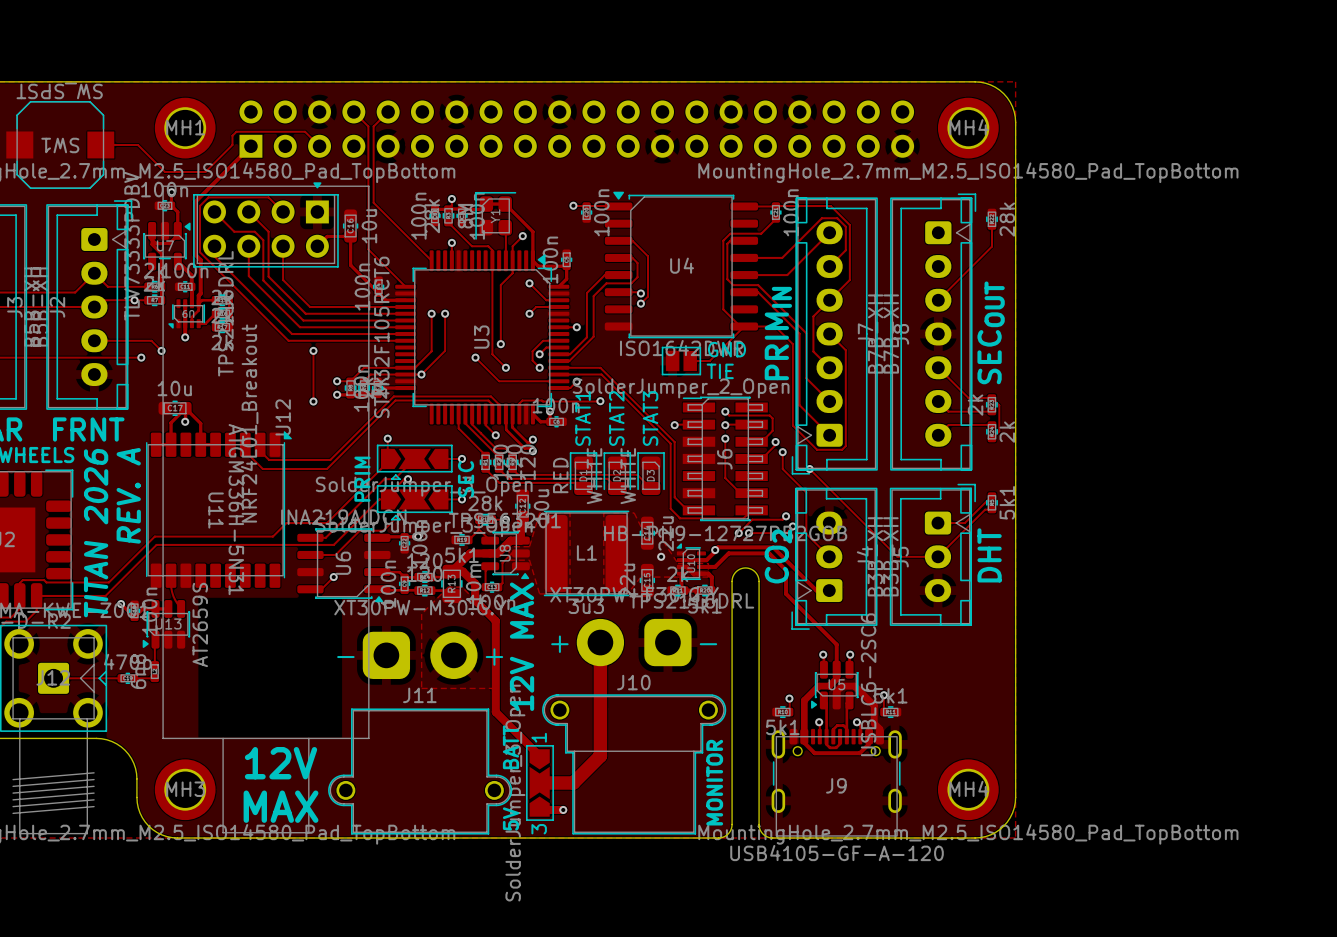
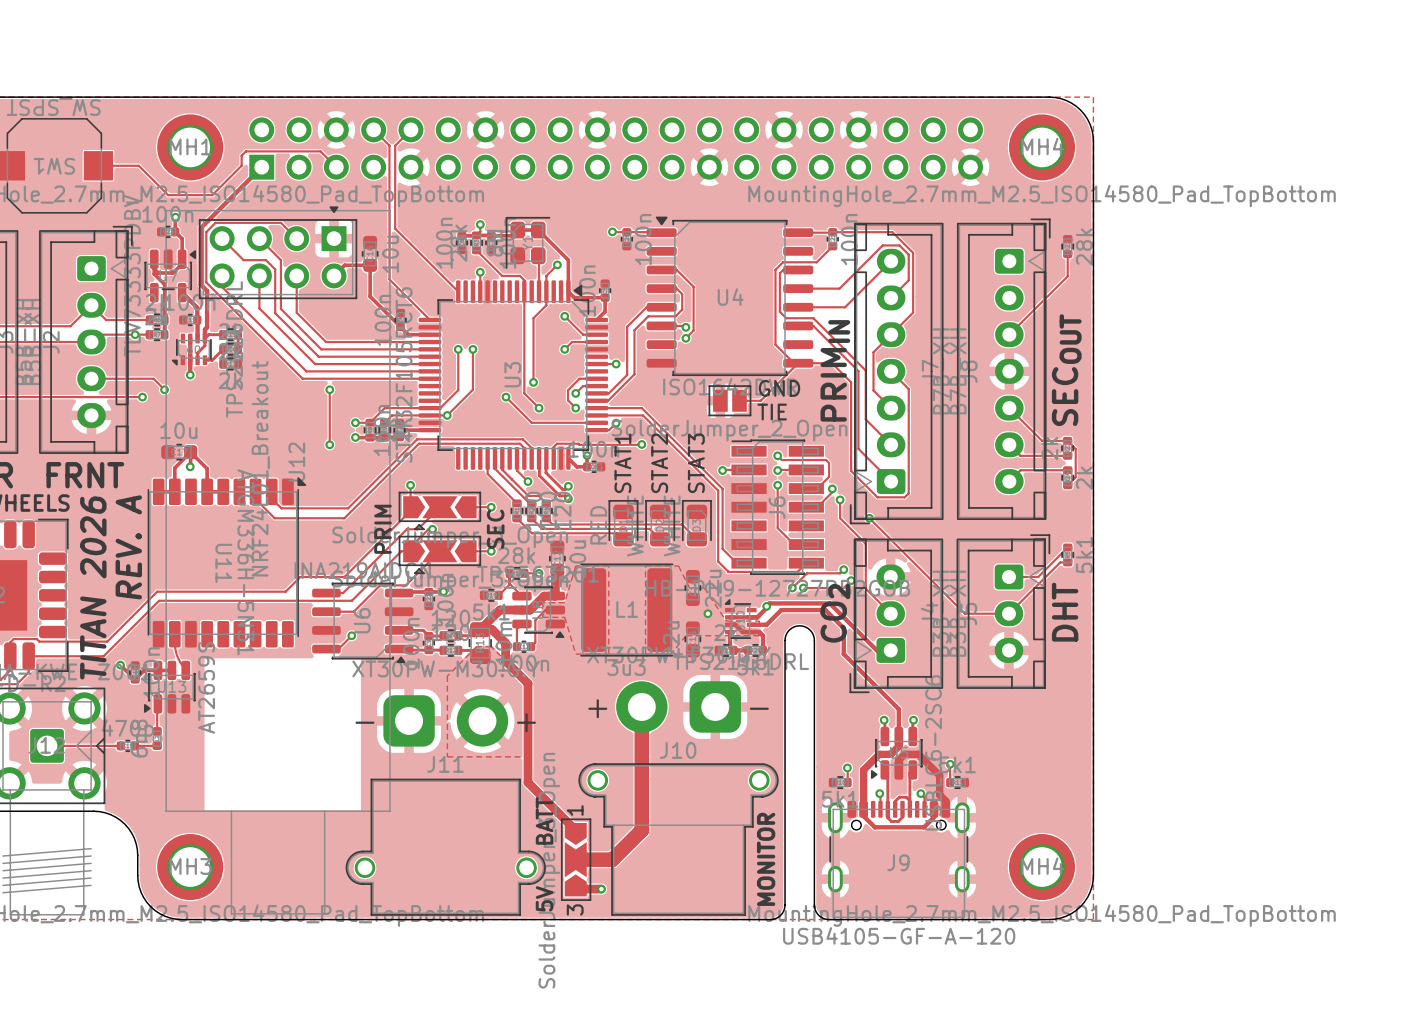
text: 12V MAX (522, 646) -> none
text: 12V (281, 763) -> none
text: MAX (281, 806) -> none

